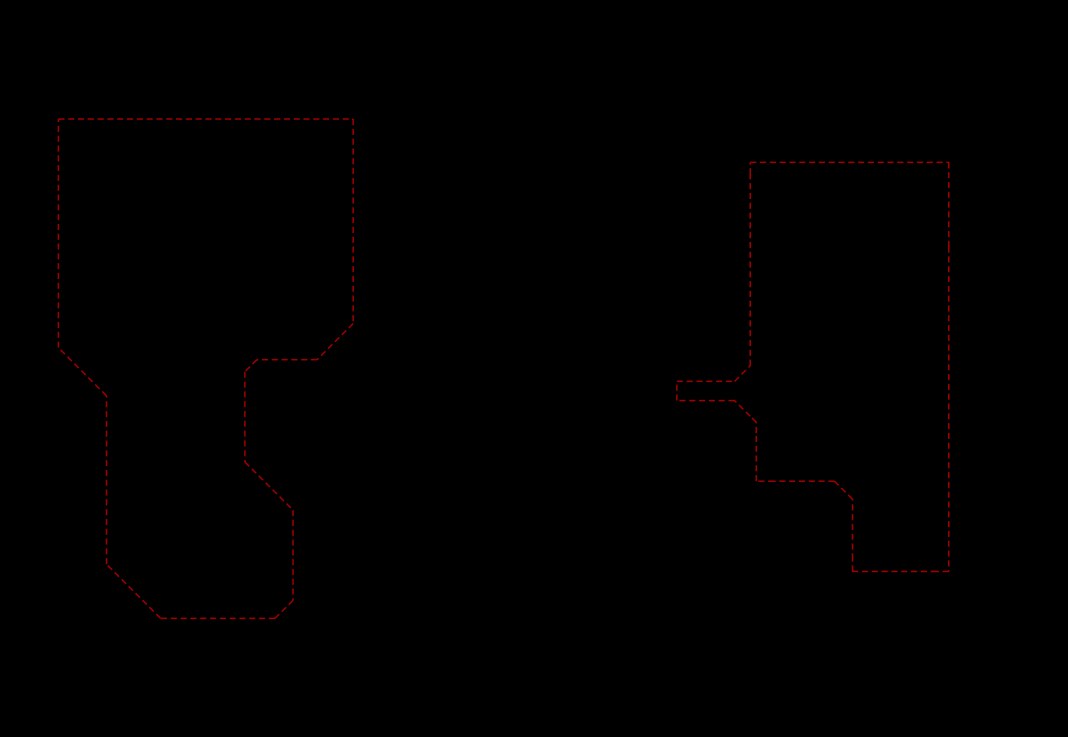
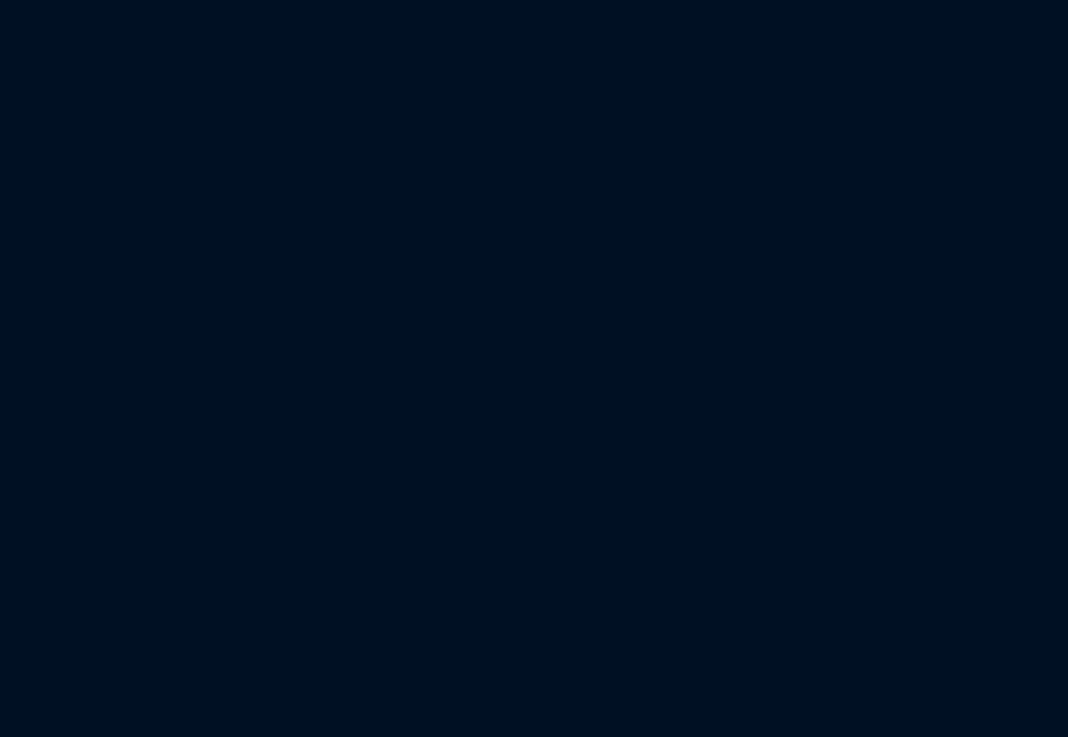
zone outline: (58, 119) (58, 347) (106, 395) (106, 564) (160, 618) (274, 618) (293, 600) (293, 510) (244, 461) (244, 371) (256, 359) (317, 359) (353, 323) (353, 119) (58, 119) -> none
zone outline: (750, 162) (750, 365) (734, 381) (676, 381) (676, 400) (734, 400) (756, 422) (756, 481) (834, 481) (852, 499) (852, 571) (948, 571) (948, 162) (750, 162) -> none

